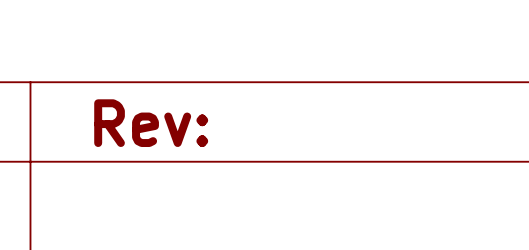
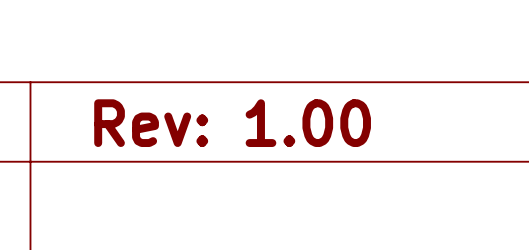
title block: Rev: (151, 123) -> Rev: 1.00 (232, 123)

